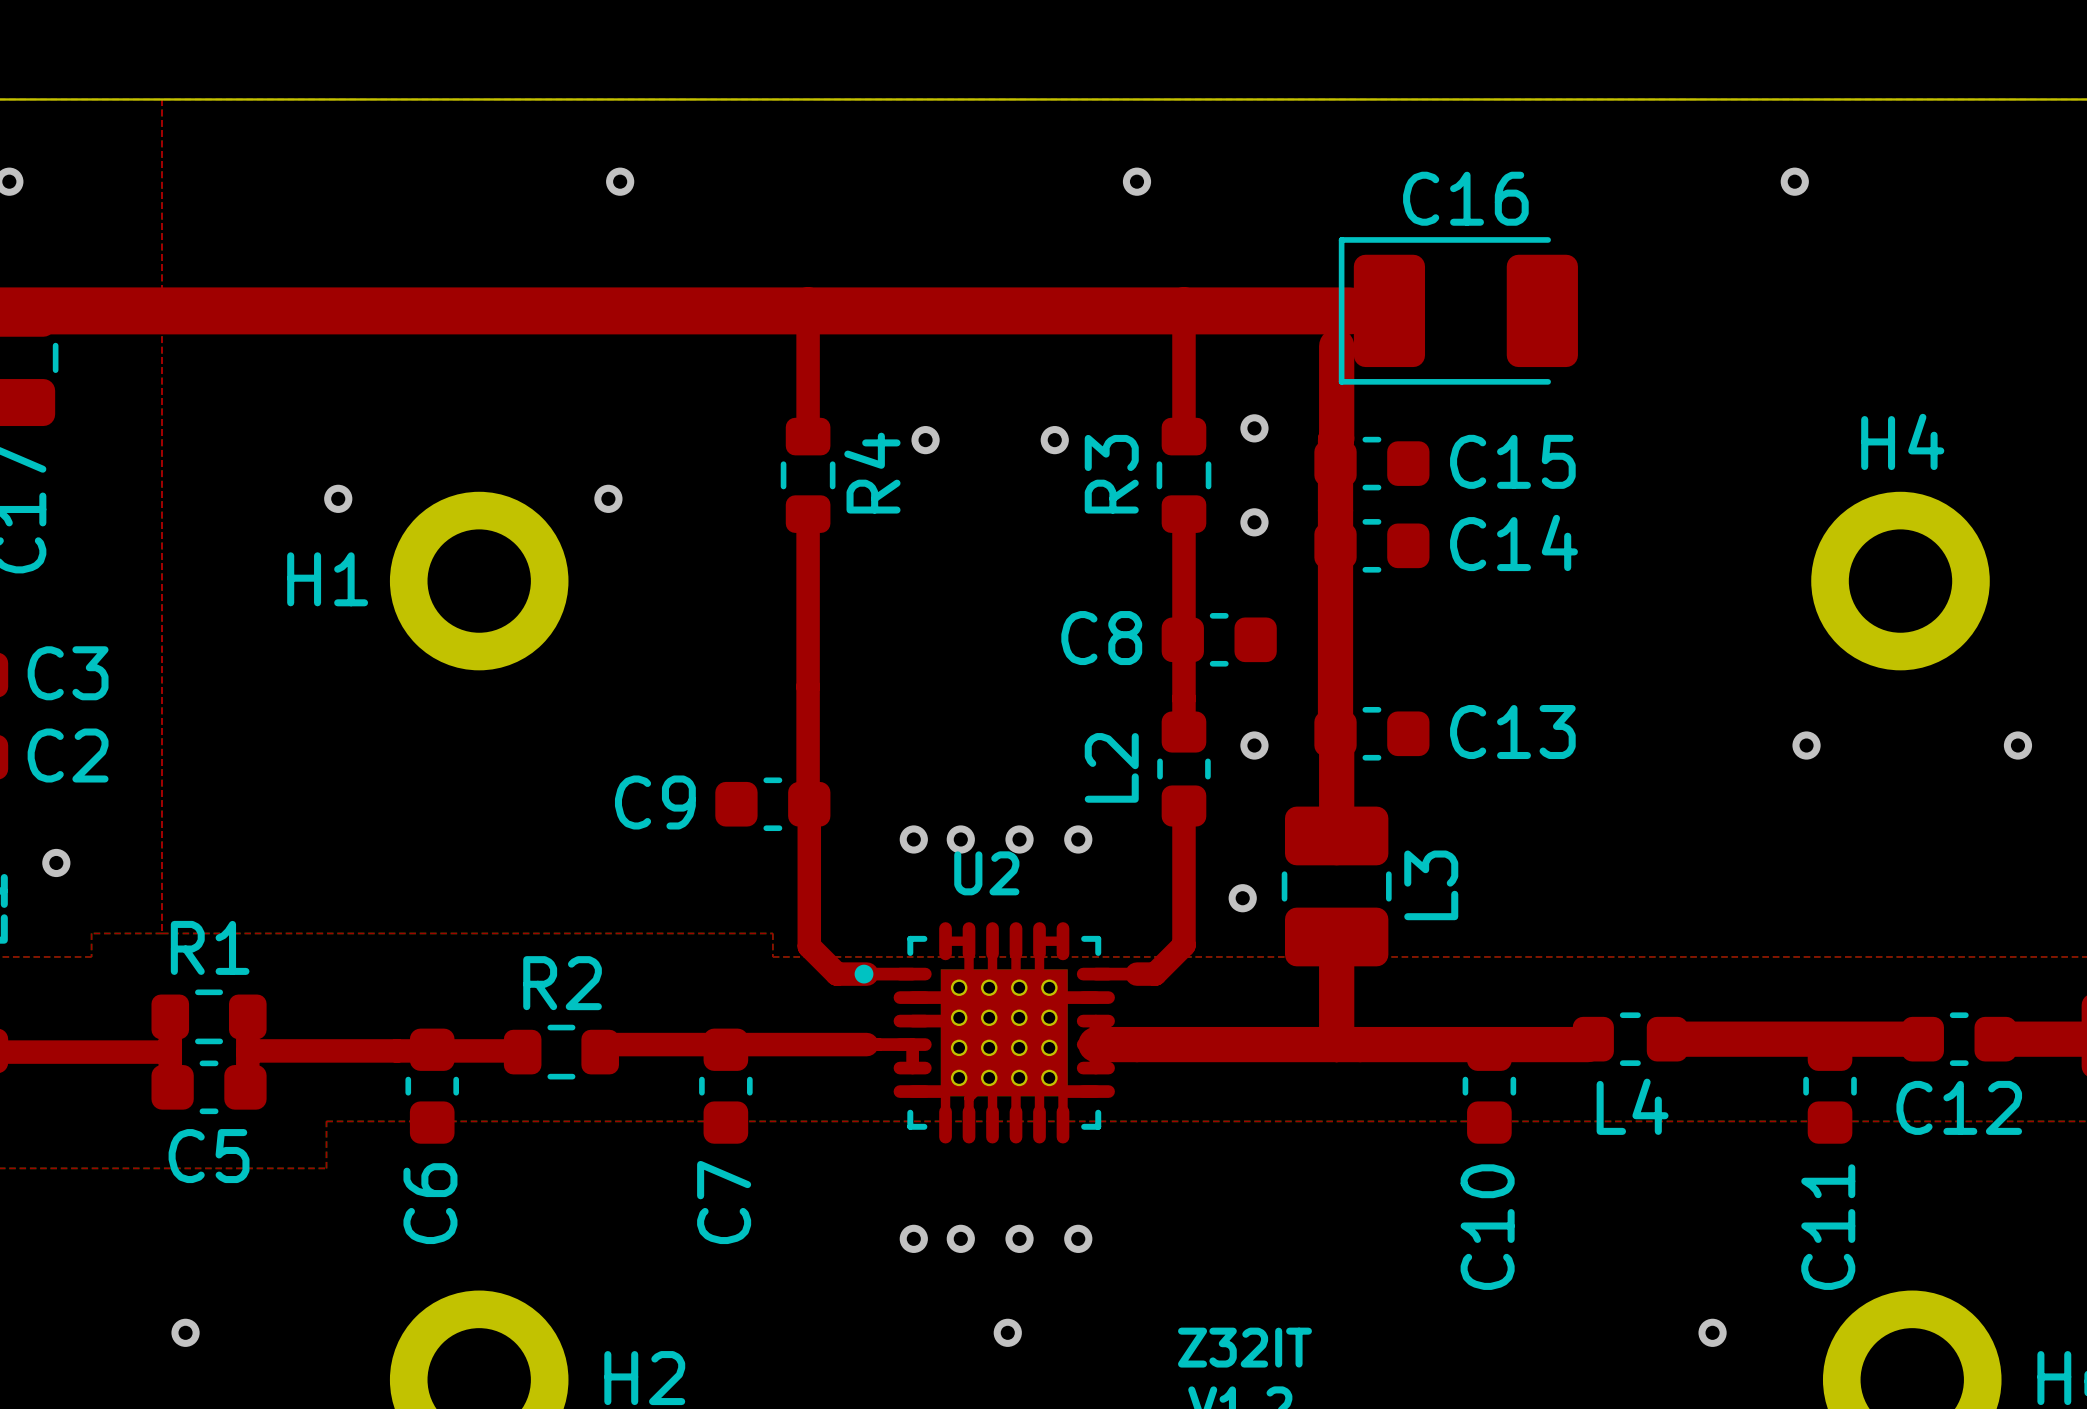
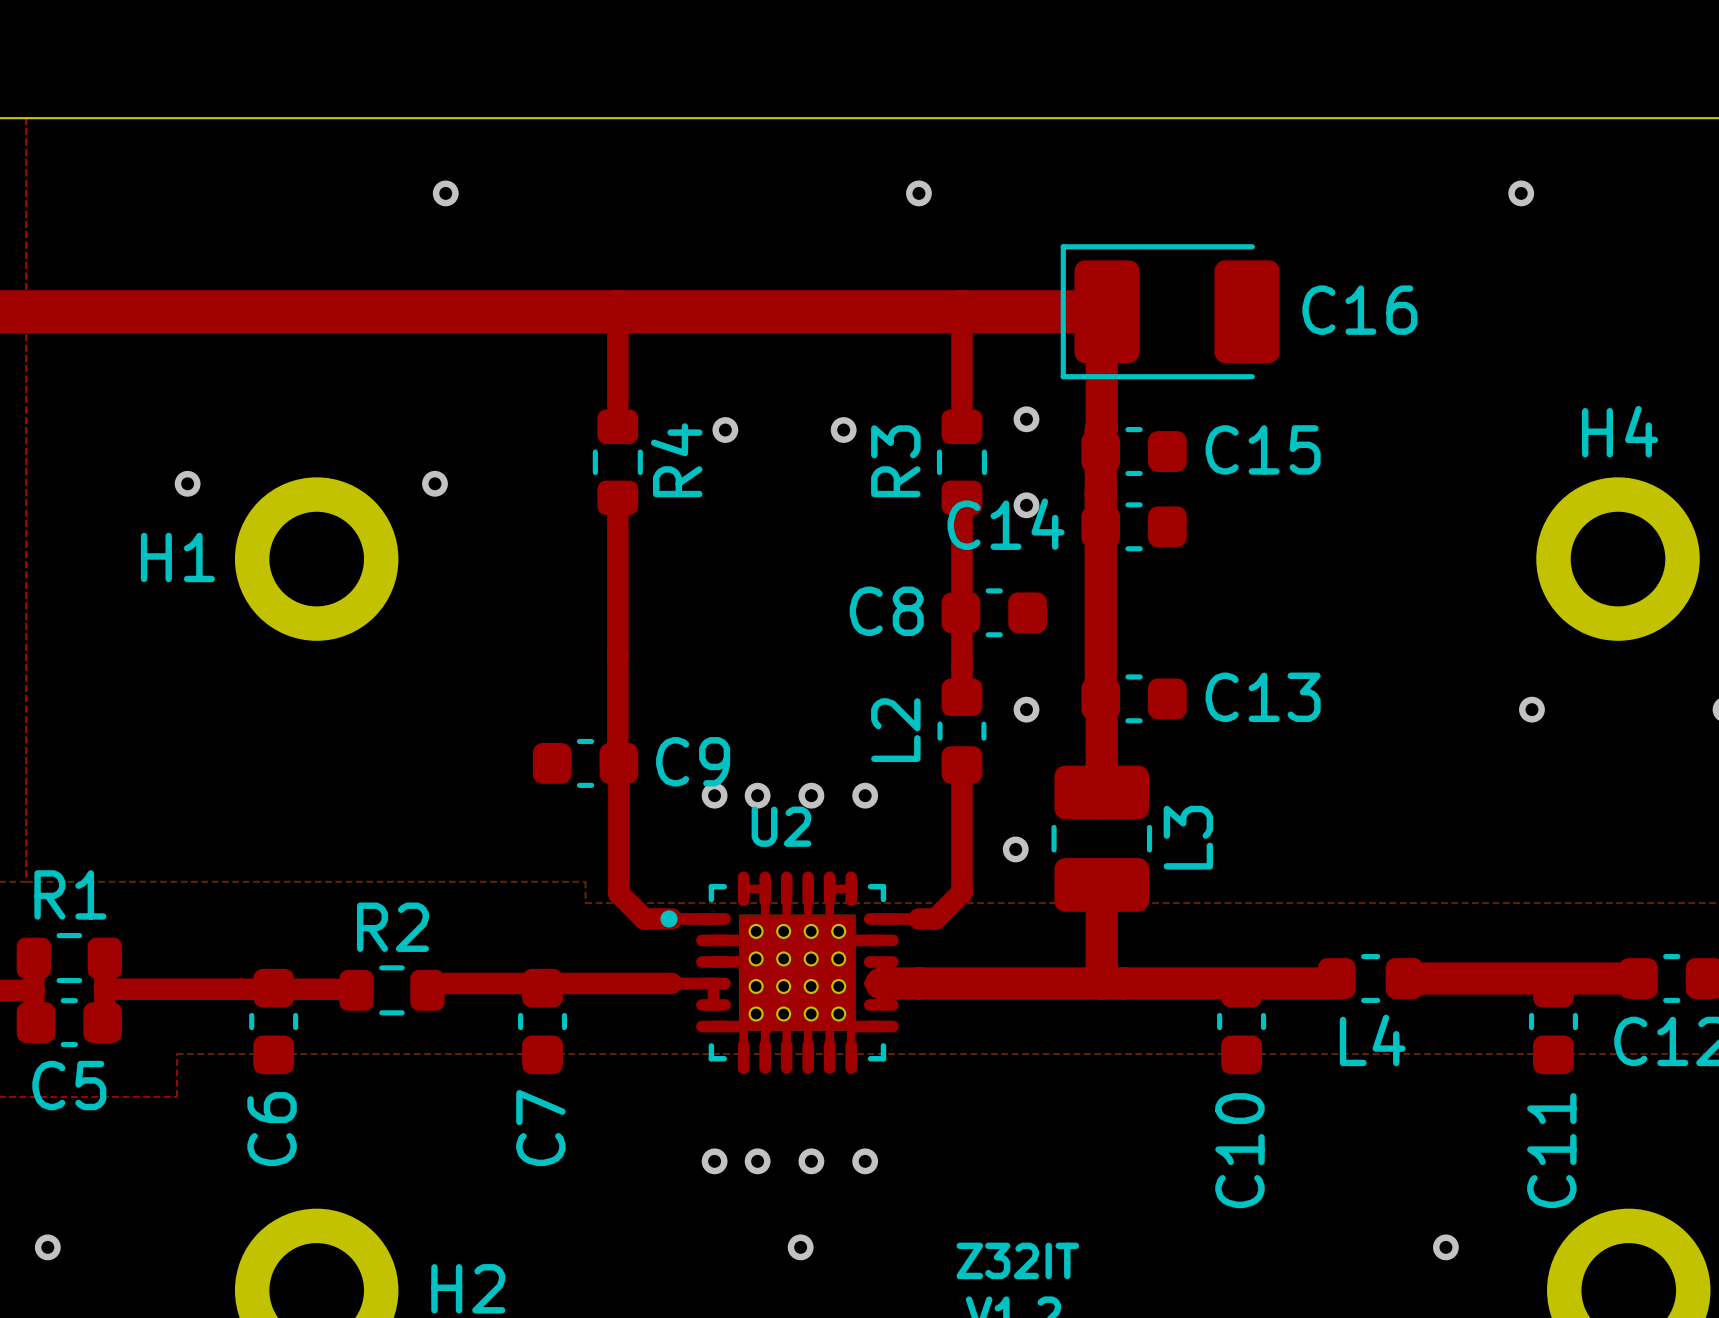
C16 name position: C16 (1465, 198) -> C16 (1359, 310)
C16 position: (1458, 310) -> (1170, 311)
C14 name position: C14 (1514, 542) -> C14 (1006, 524)
C9 name position: C9 (655, 802) -> C9 (693, 761)

